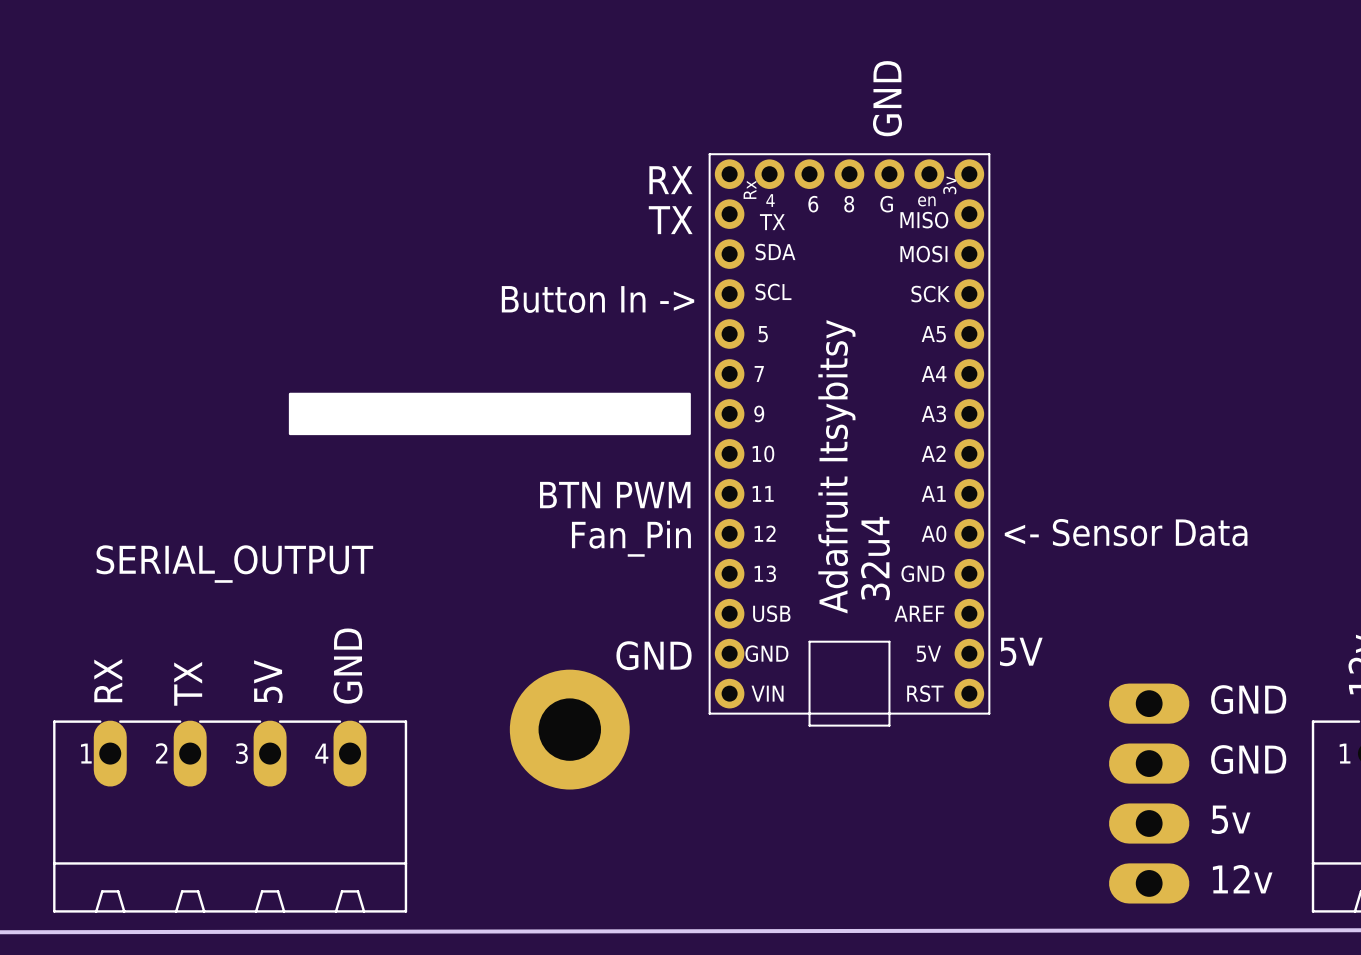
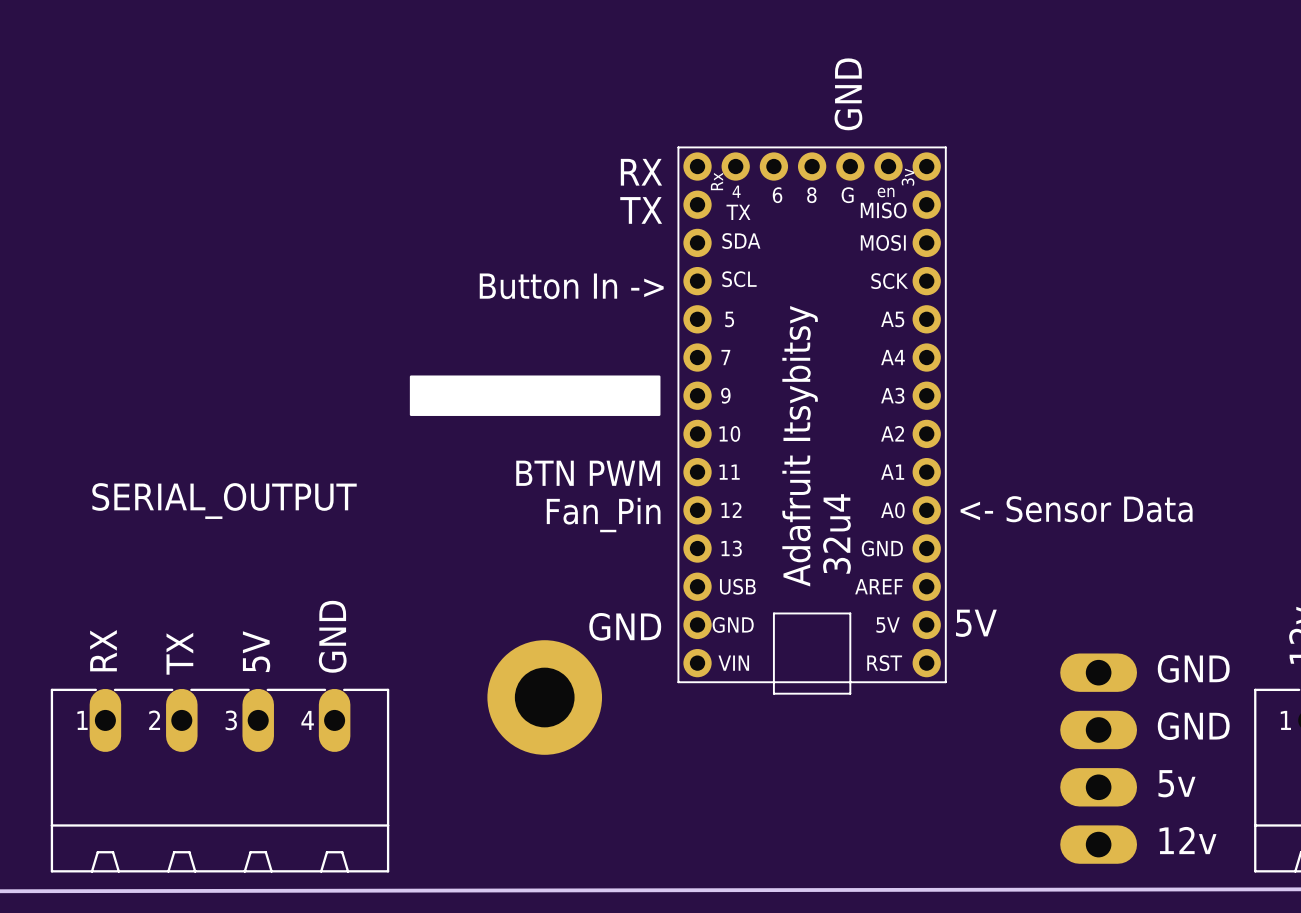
drawing: [288, 392, 691, 436] -> none
drawing: none -> [409, 375, 661, 416]
SERIAL_OUTPUT name position: SERIAL_OUTPUT (234, 564) -> SERIAL_OUTPUT (224, 501)

